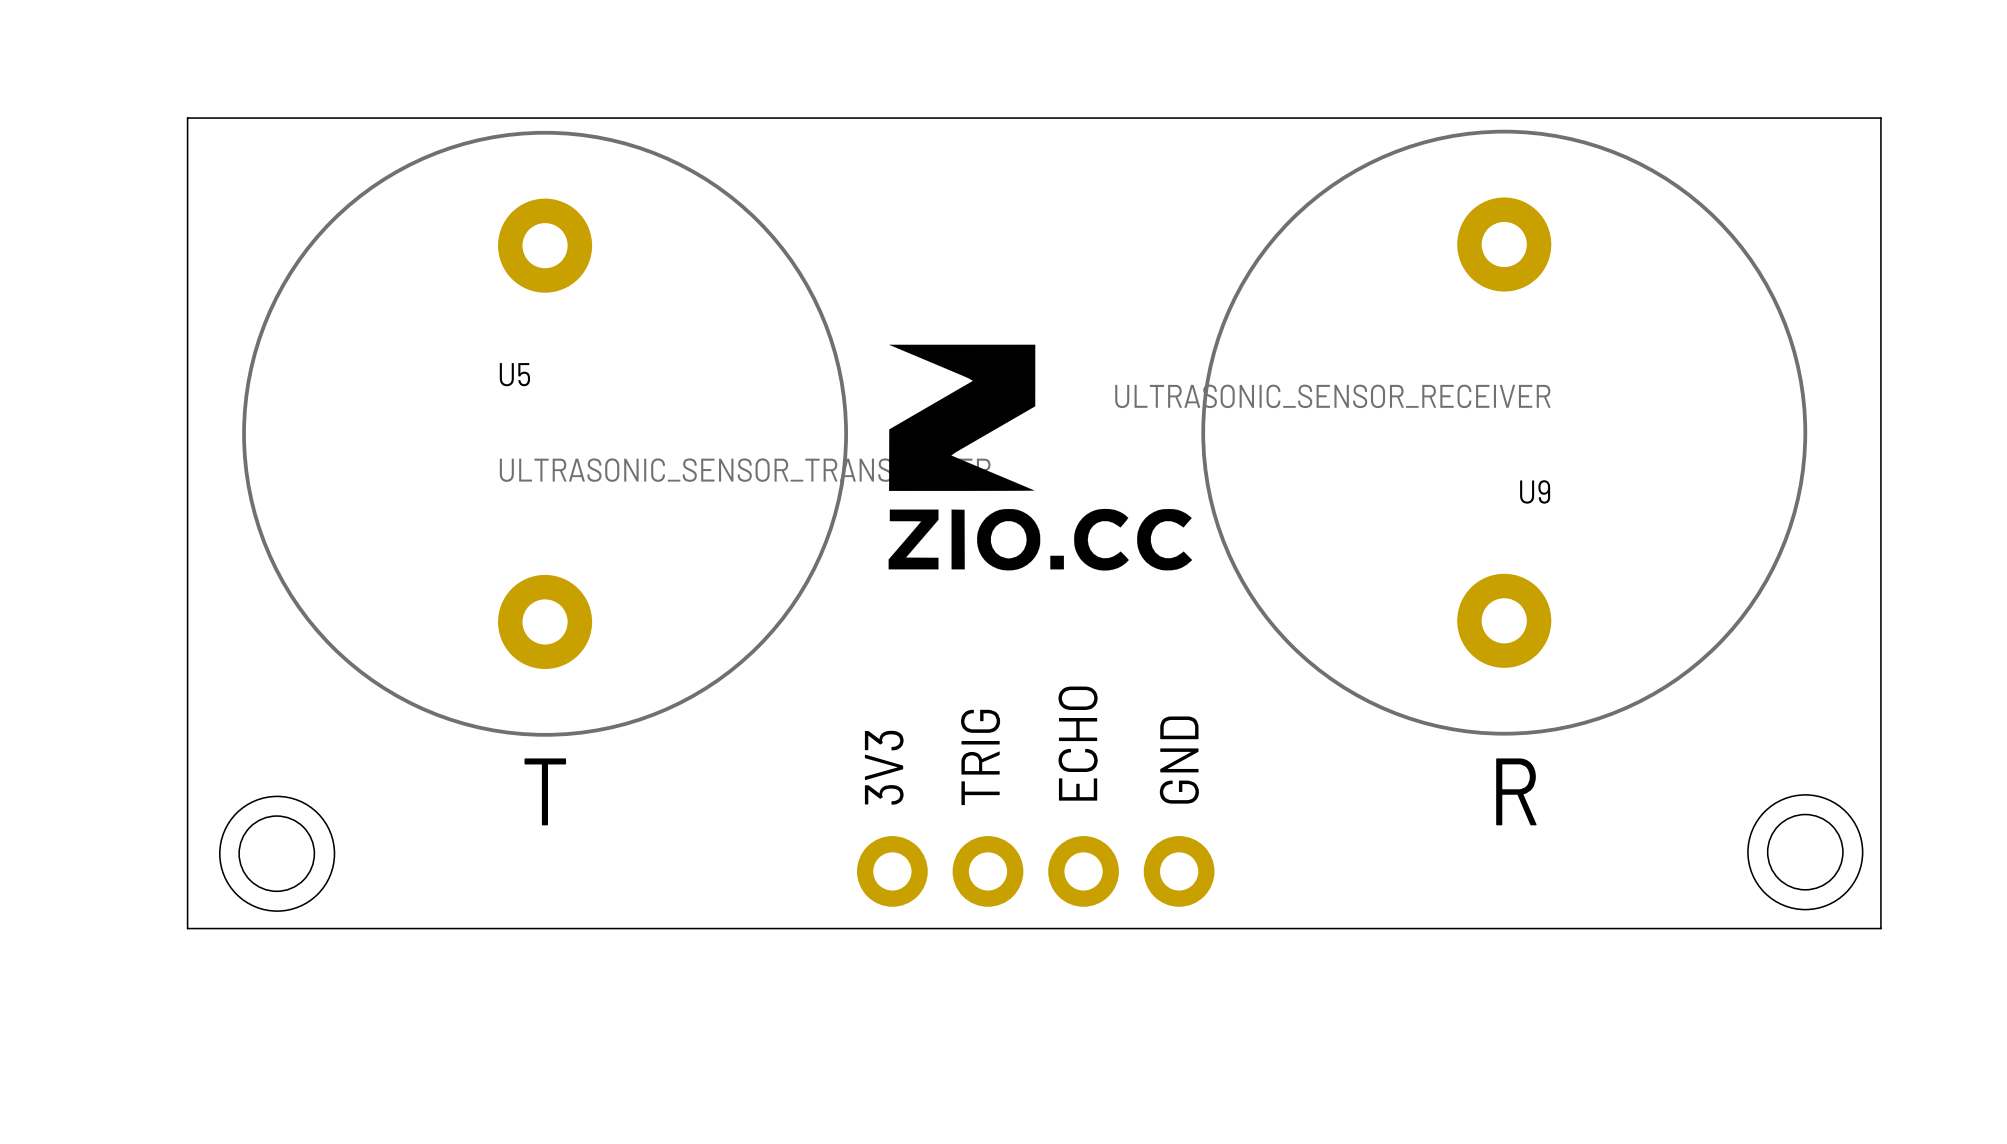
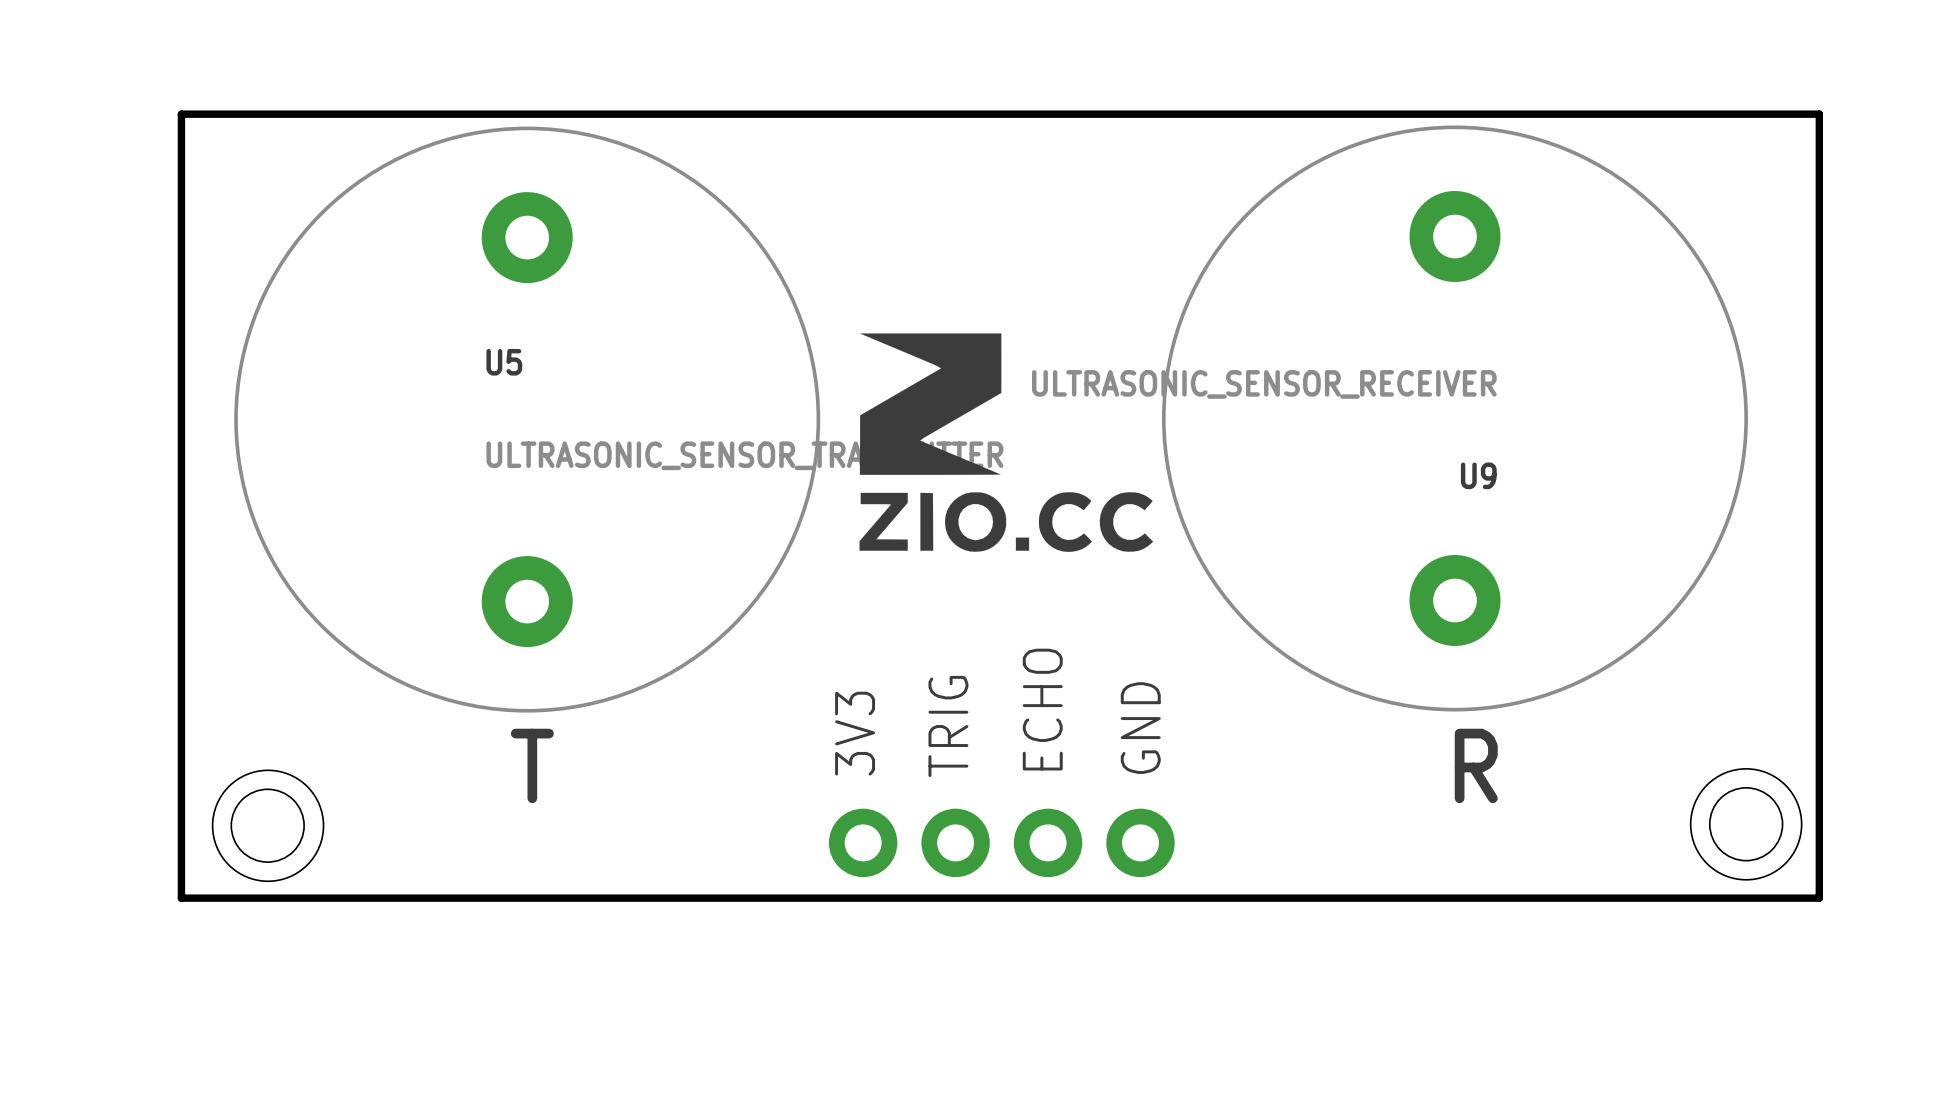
board edge width: thin (1880, 118) (187, 118) (187, 928) (1880, 928) (1880, 118) -> thick (1819, 114) (181, 114) (181, 898) (1819, 898) (1819, 114)

